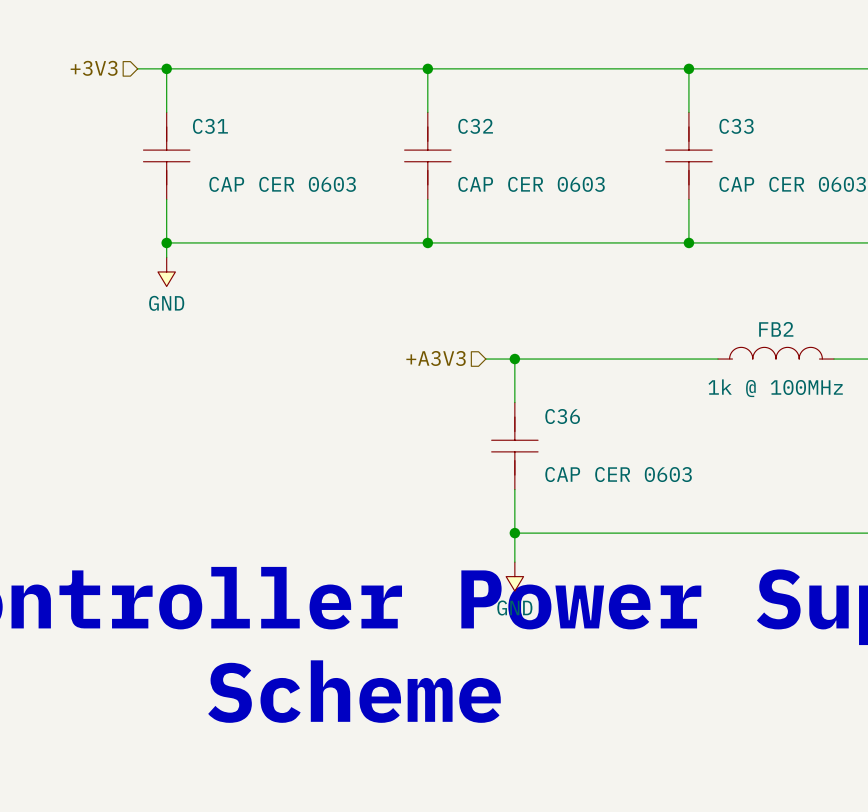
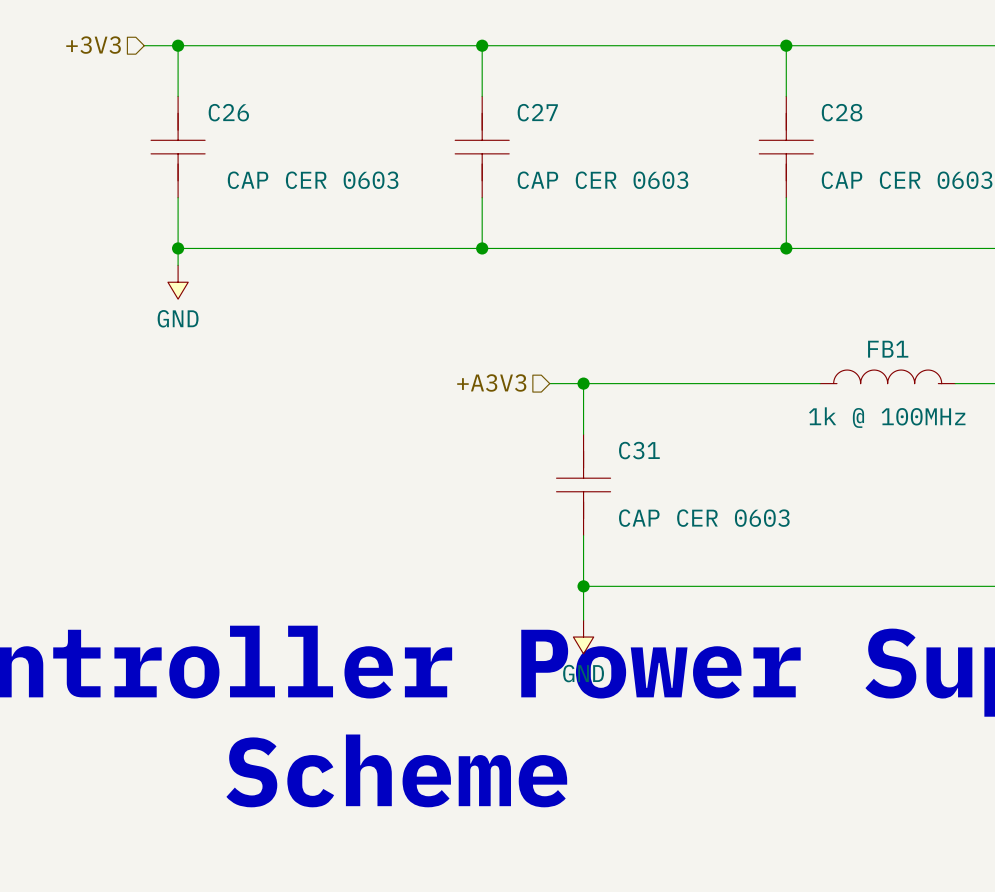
C31 name: C31 (210, 126) -> C26 (228, 112)
C32 name: C32 (475, 126) -> C27 (537, 112)
C33 name: C33 (736, 126) -> C28 (842, 112)
FB2 name: FB2 (776, 329) -> FB1 (888, 349)
C36 name: C36 (562, 416) -> C31 (639, 450)

